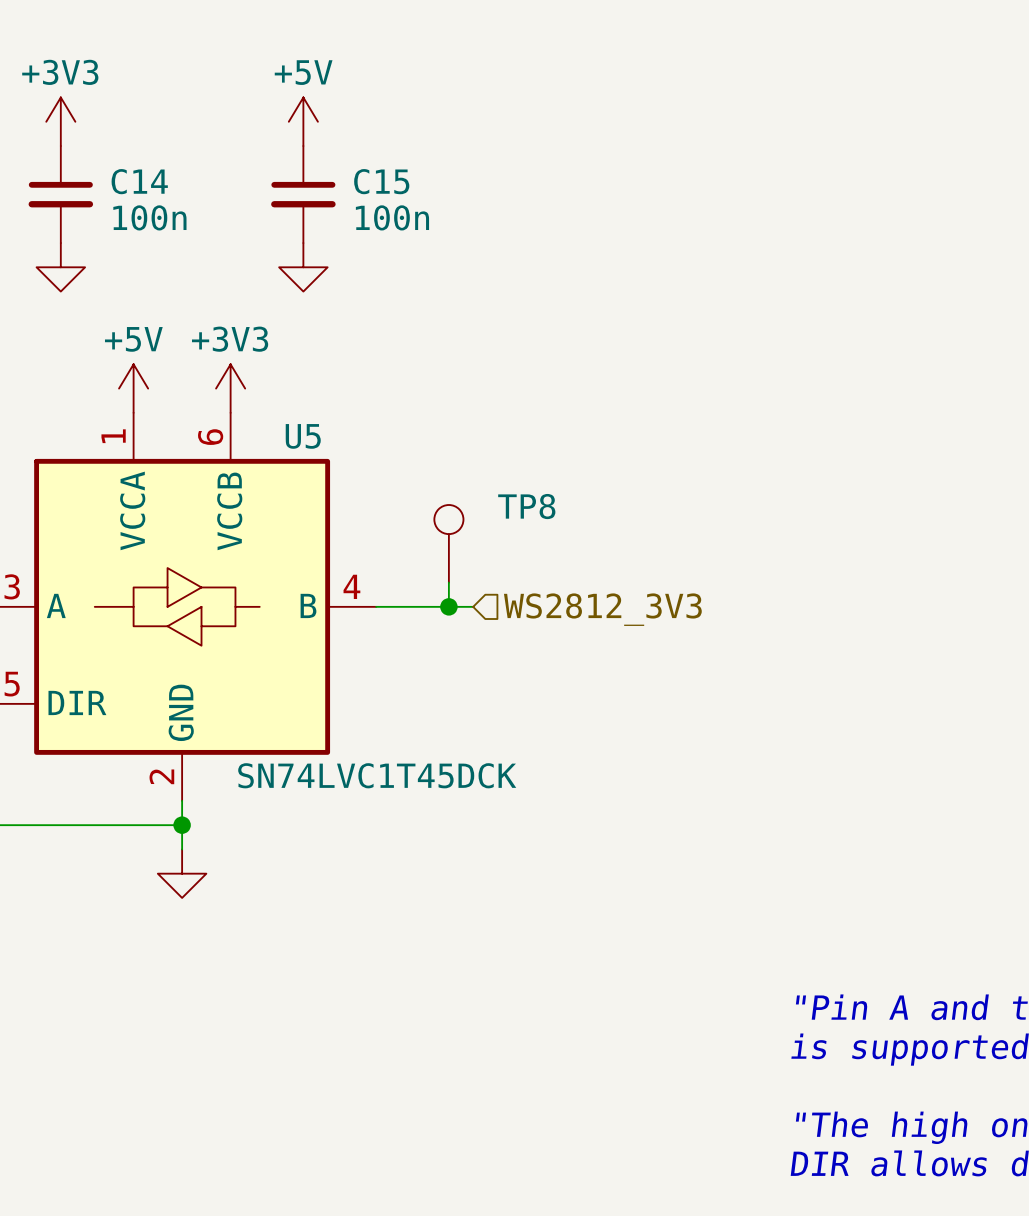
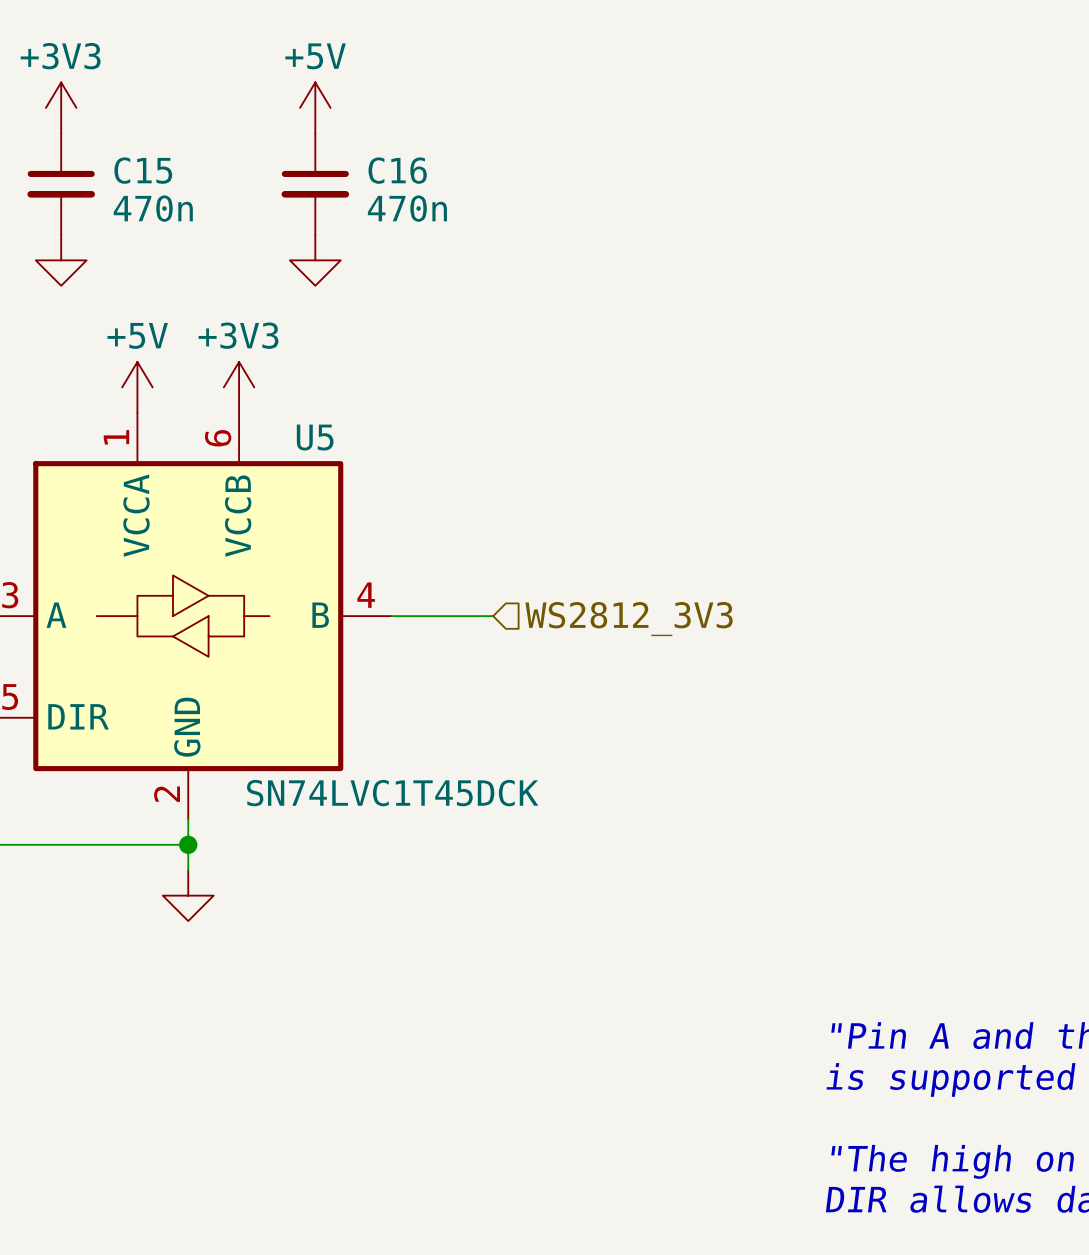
C14 name: C14 (139, 181) -> C15 (143, 170)
C15 name: C15 (381, 181) -> C16 (397, 170)
C14 value: 100n (149, 217) -> 470n (153, 208)
C15 value: 100n (392, 217) -> 470n (407, 208)
TP8: (448, 543) -> none
wire: (448, 582) (448, 606) -> none
junction: (448, 606) -> none

